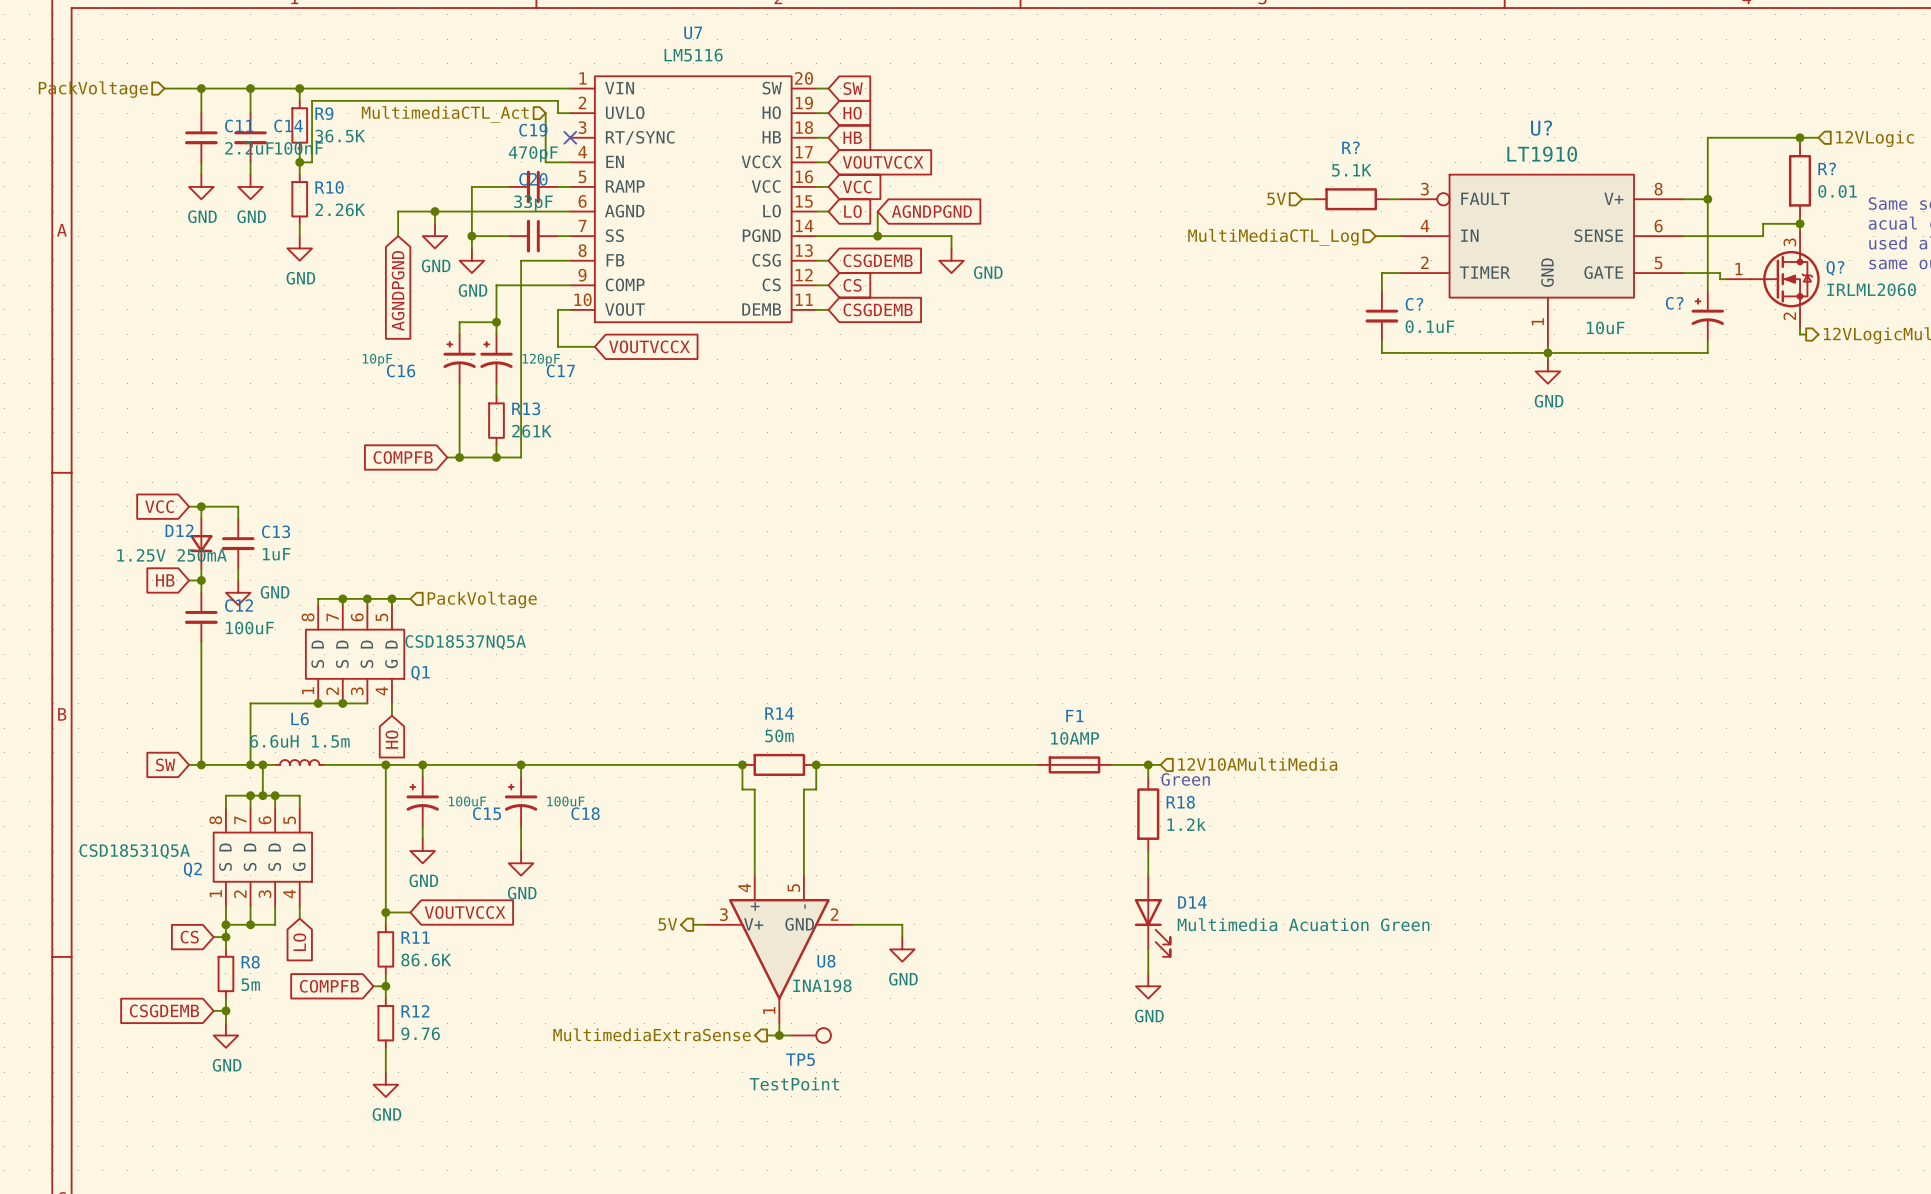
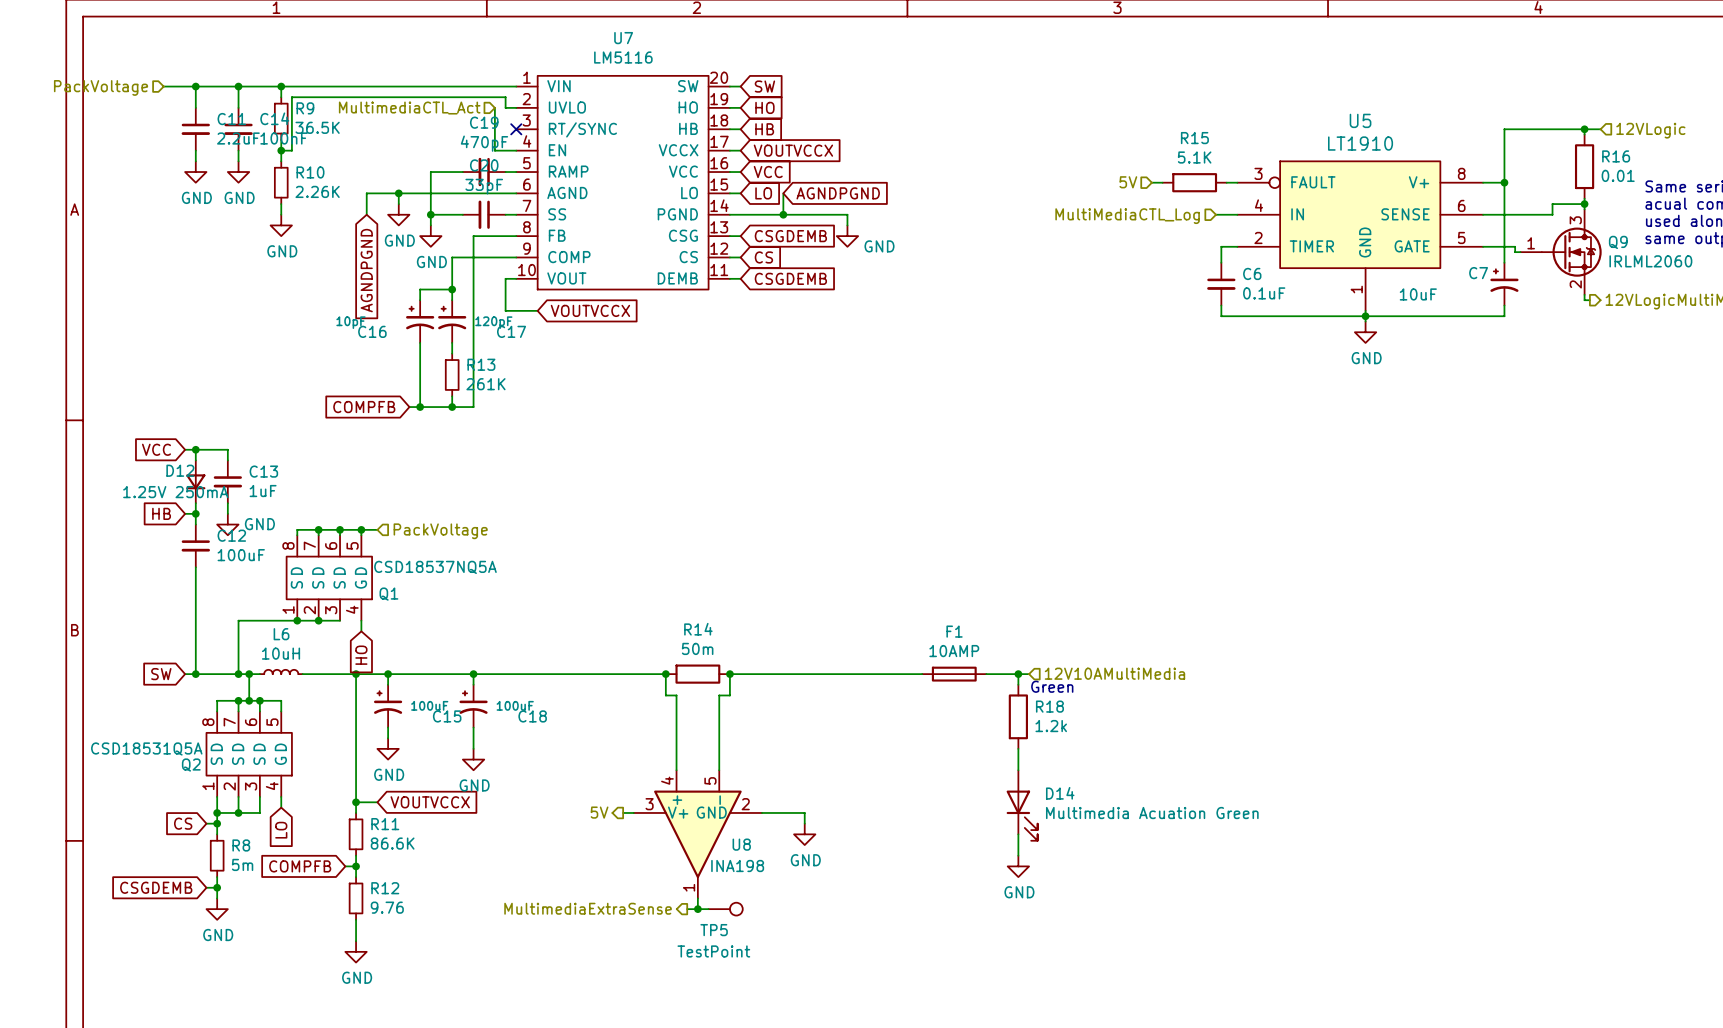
U? name: U? (1541, 128) -> U5 (1360, 120)
R? name: R? (1350, 147) -> R15 (1194, 138)
R? name: R? (1827, 168) -> R16 (1616, 156)
Q? name: Q? (1835, 268) -> Q9 (1618, 242)
C? name: C? (1674, 303) -> C7 (1478, 273)
C? name: C? (1414, 304) -> C6 (1252, 273)
L6 value: 6.6uH 1.5m (299, 741) -> 10uH (281, 653)

